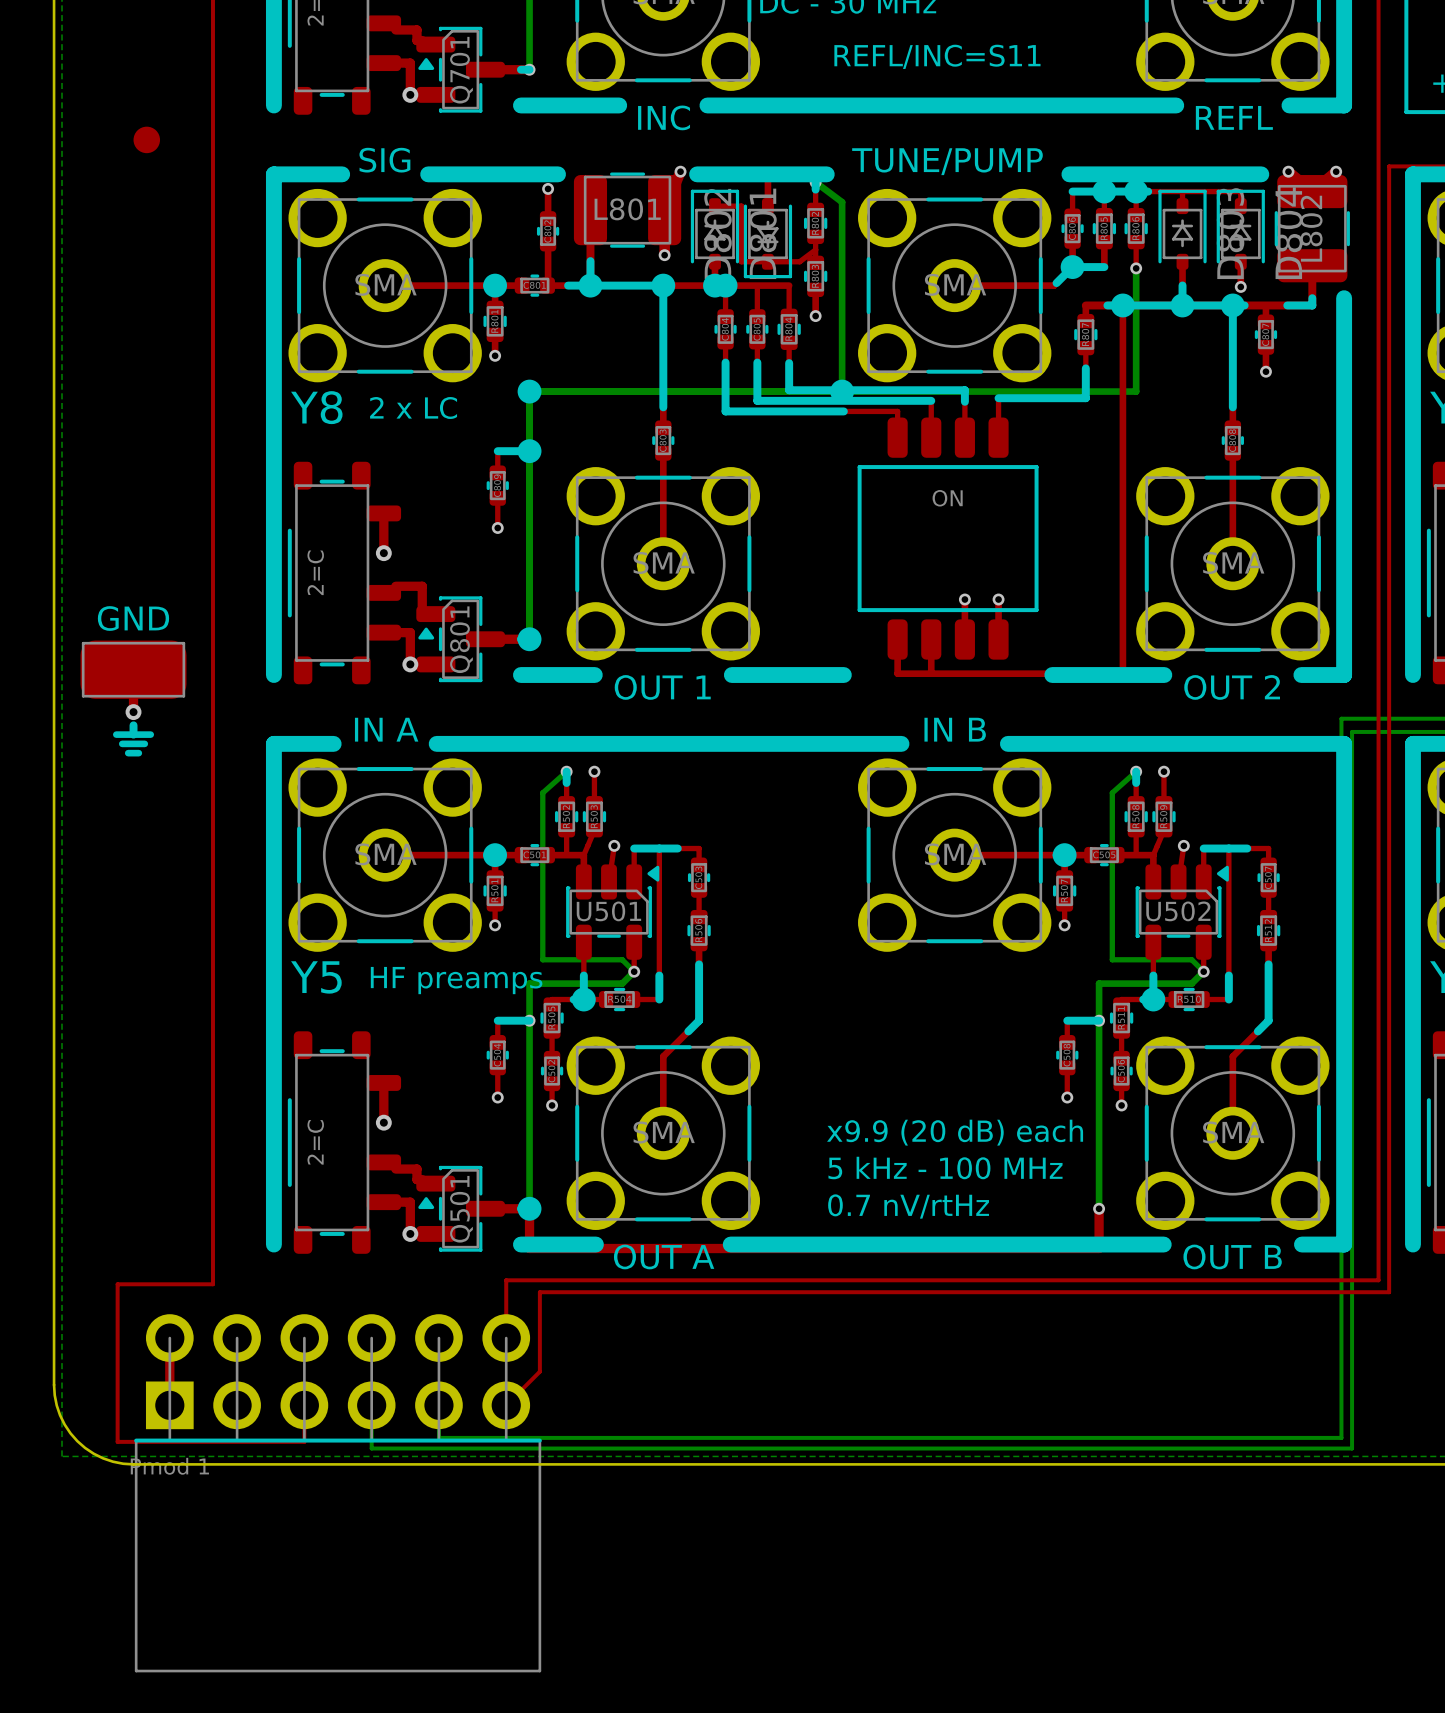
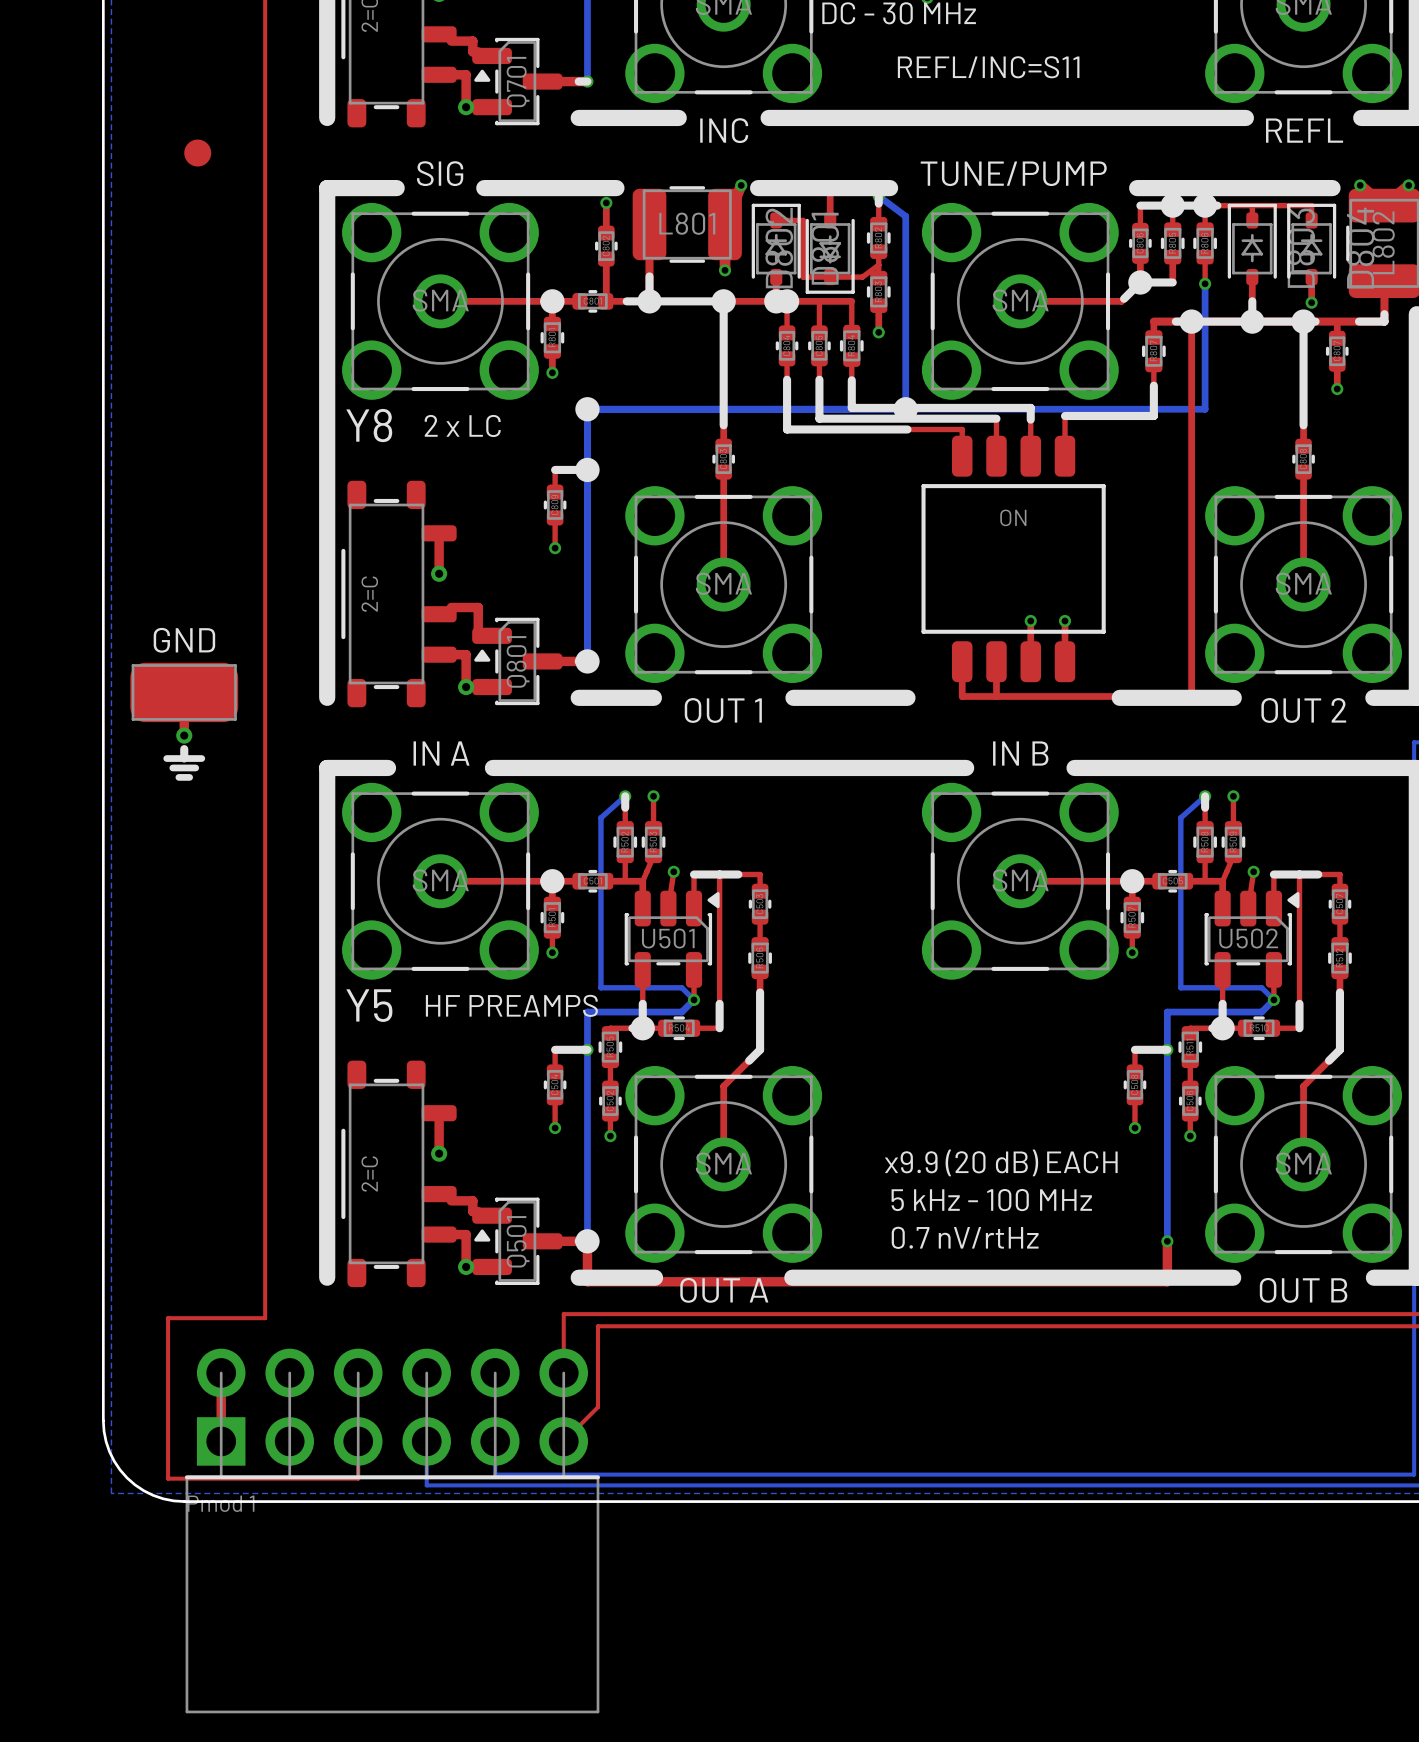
text: HF preamps (456, 980) -> HF PREAMPS (511, 1005)
text: x9.9 (20 dB) each (955, 1132) -> x9.9 (20 dB) EACH (1001, 1162)

